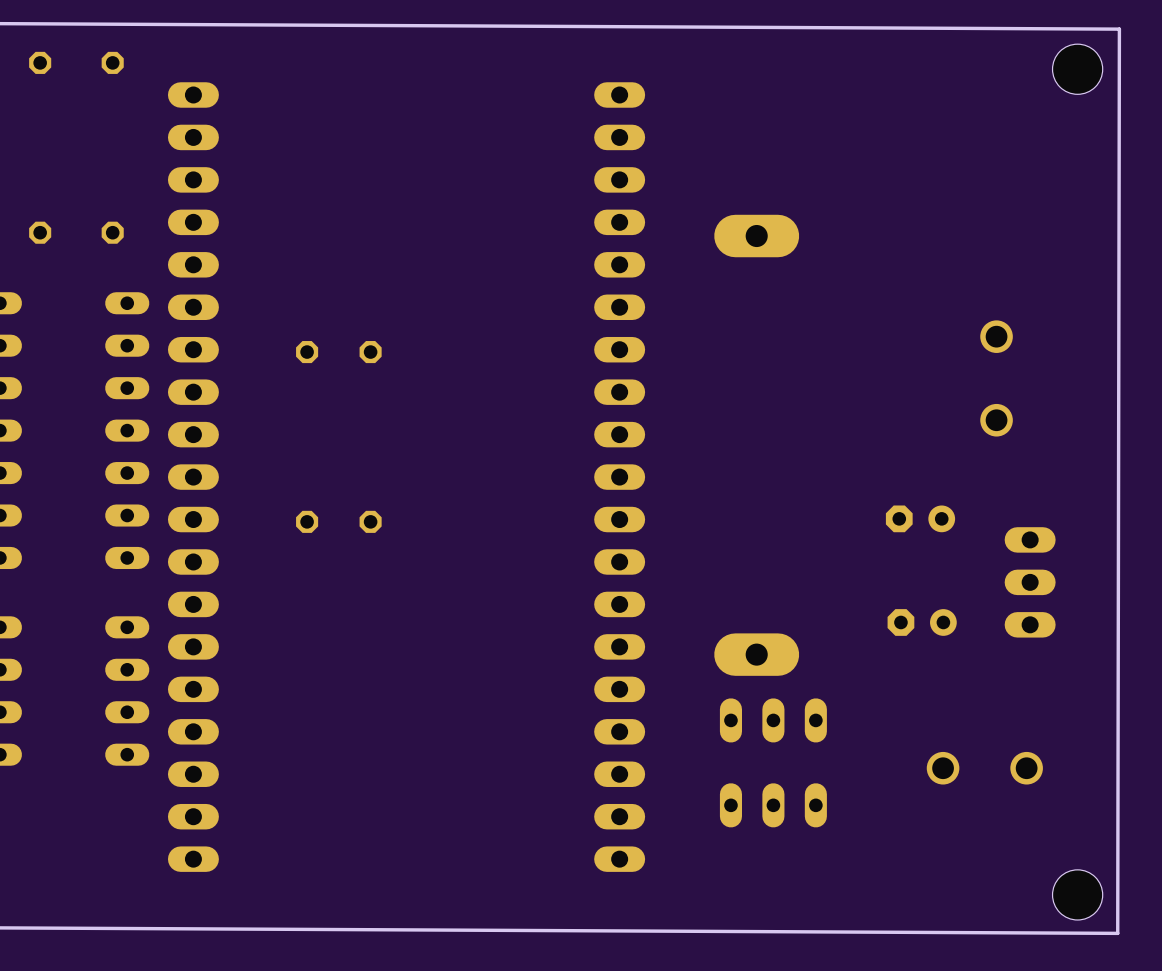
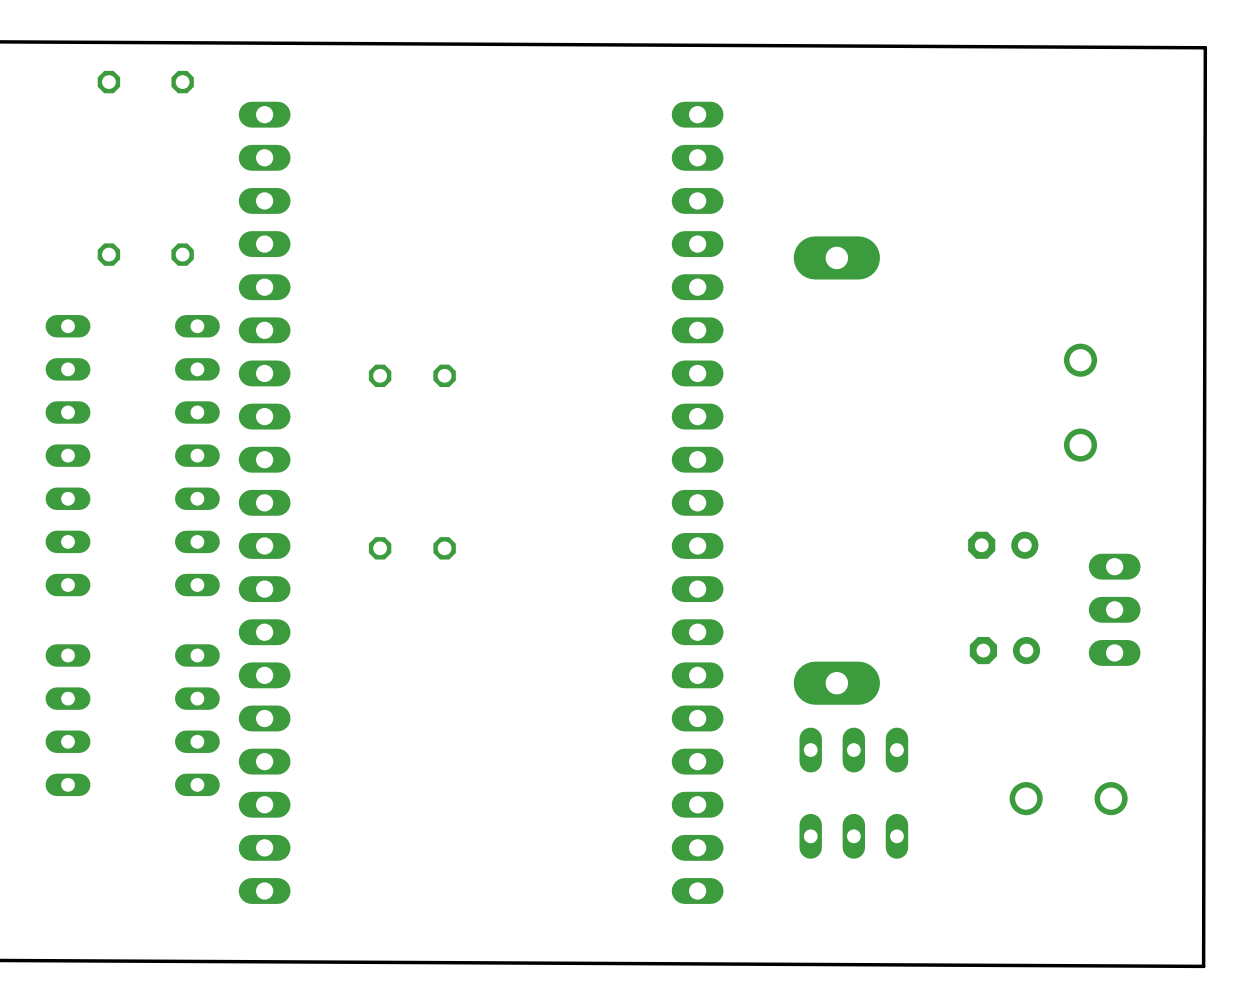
hole: (1077, 69) -> none
hole: (1077, 894) -> none

